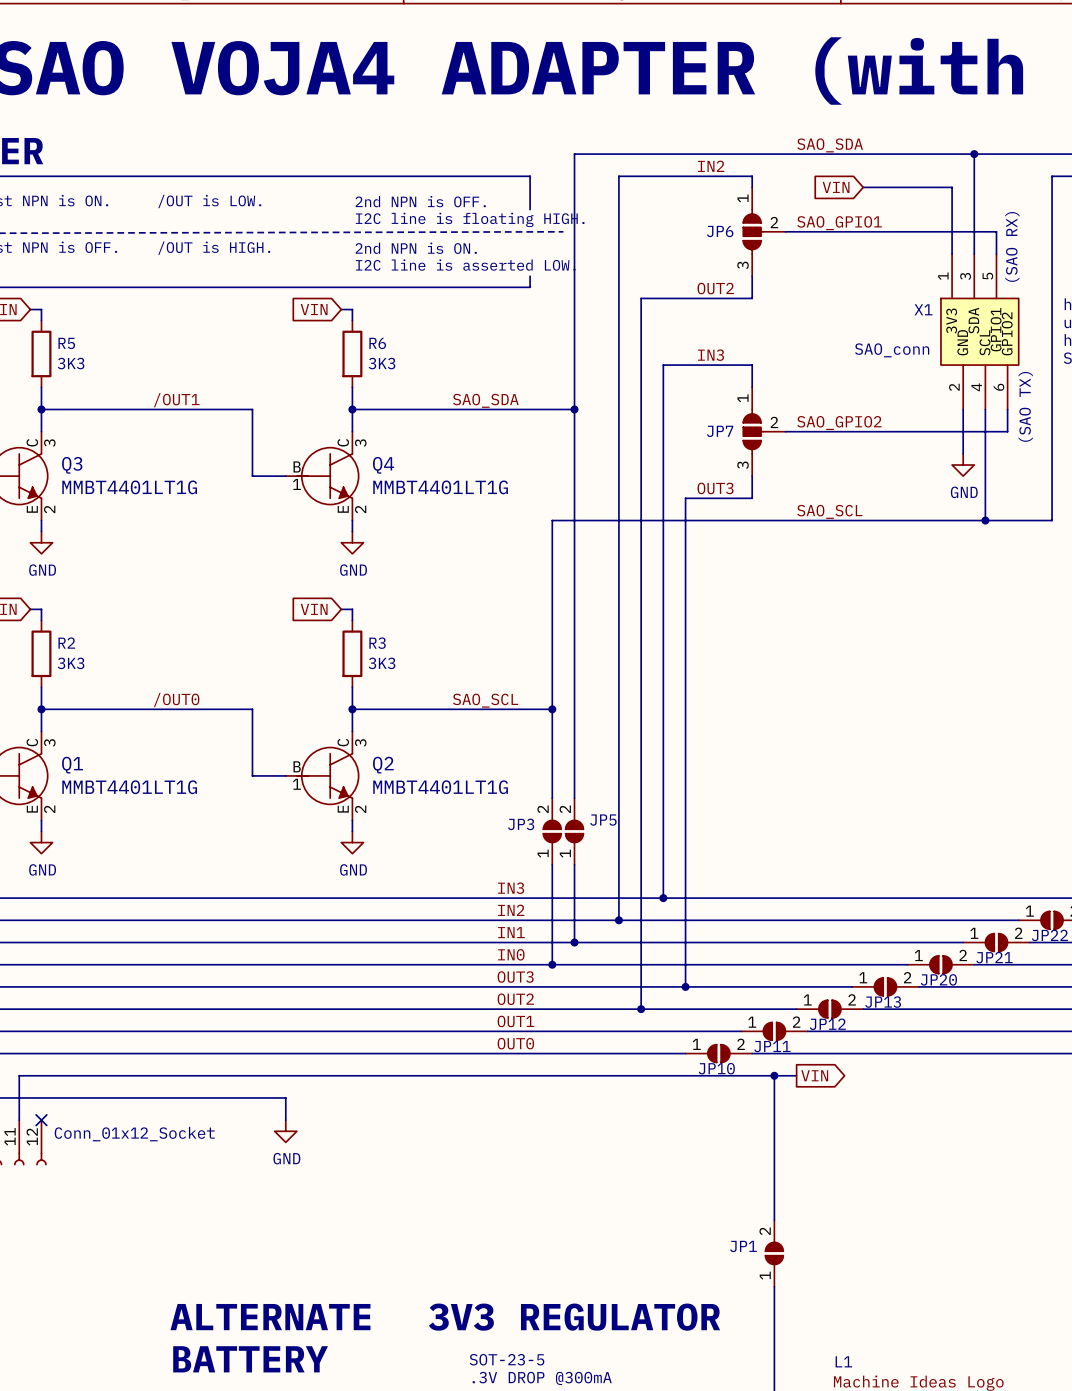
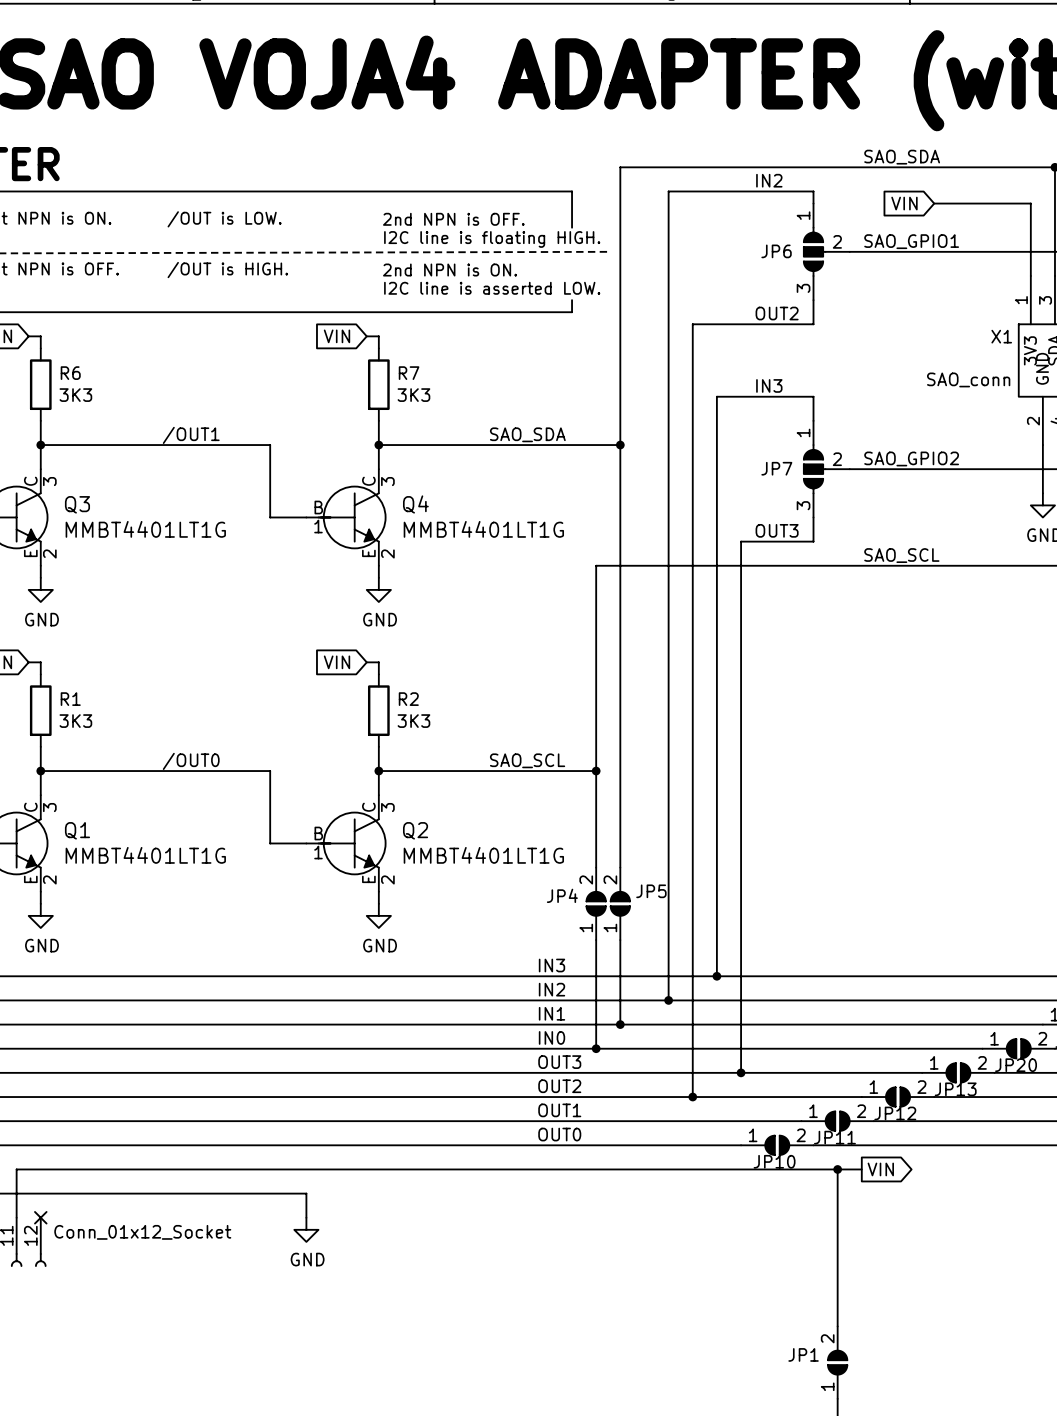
R5 name: R5 (66, 343) -> R6 (70, 373)
R6 name: R6 (377, 343) -> R7 (409, 373)
R2 name: R2 (66, 643) -> R1 (70, 699)
R3 name: R3 (377, 643) -> R2 (408, 699)
JP3 name: JP3 (521, 824) -> JP4 (562, 895)

